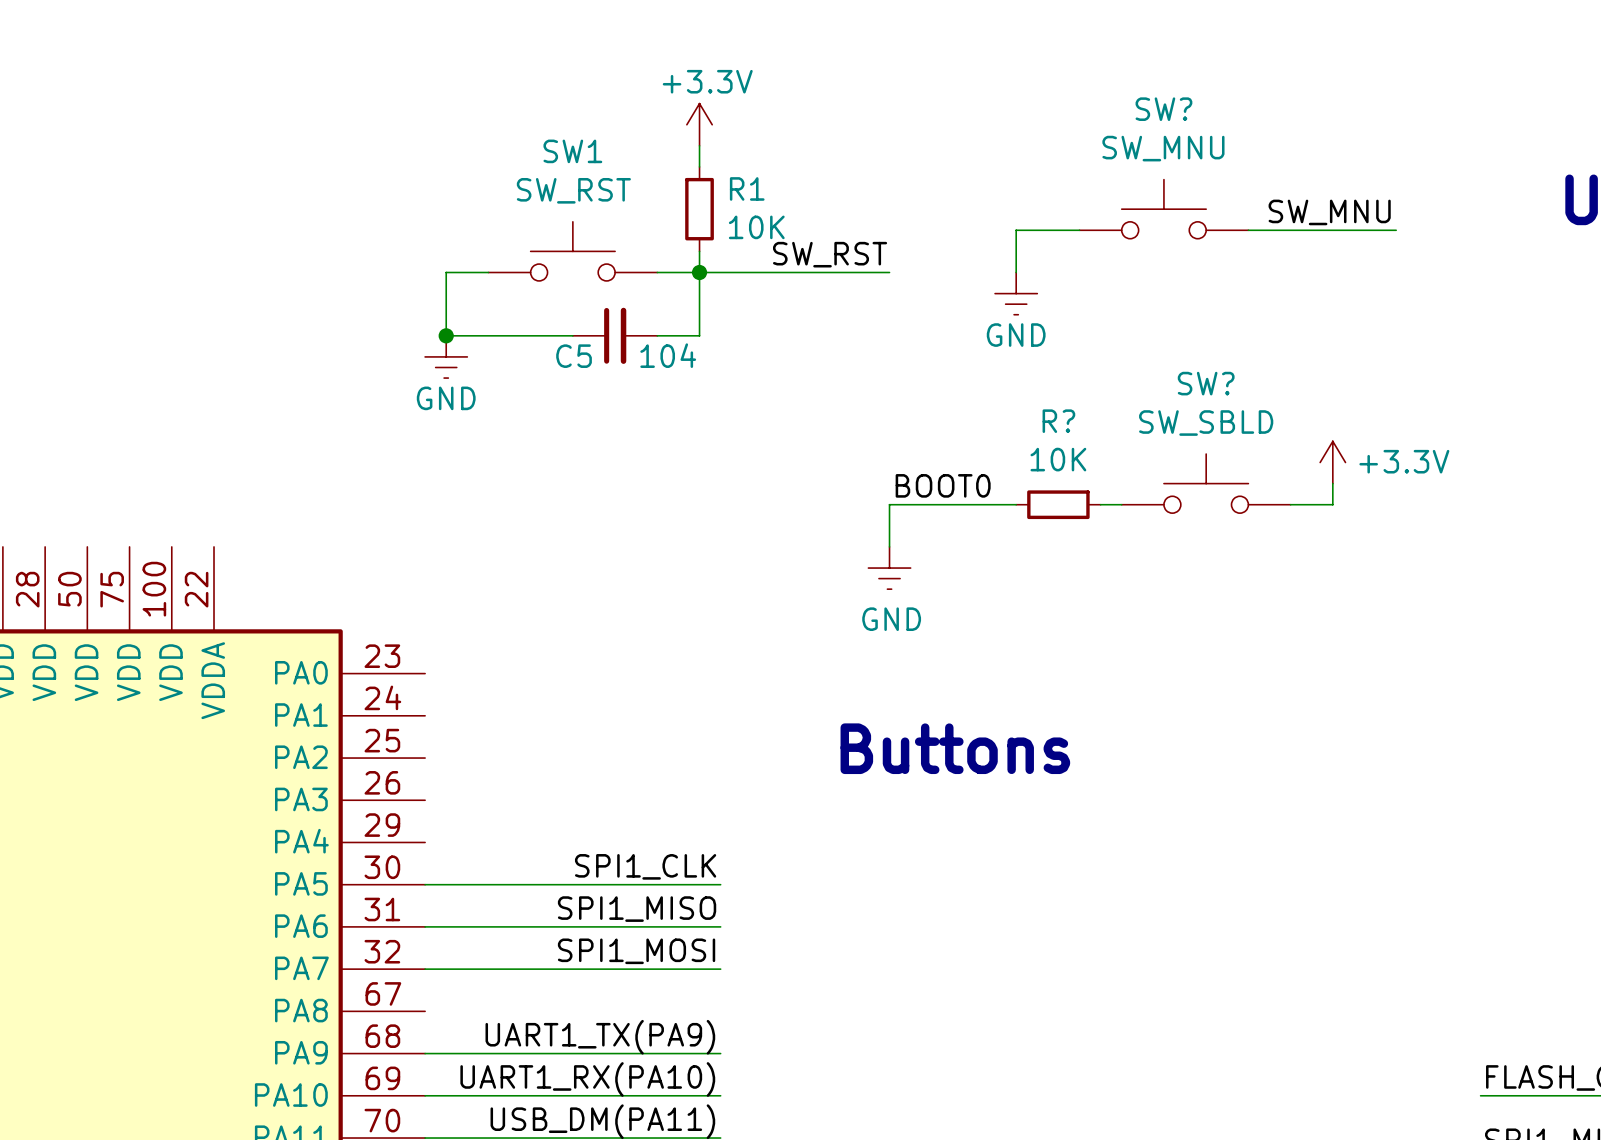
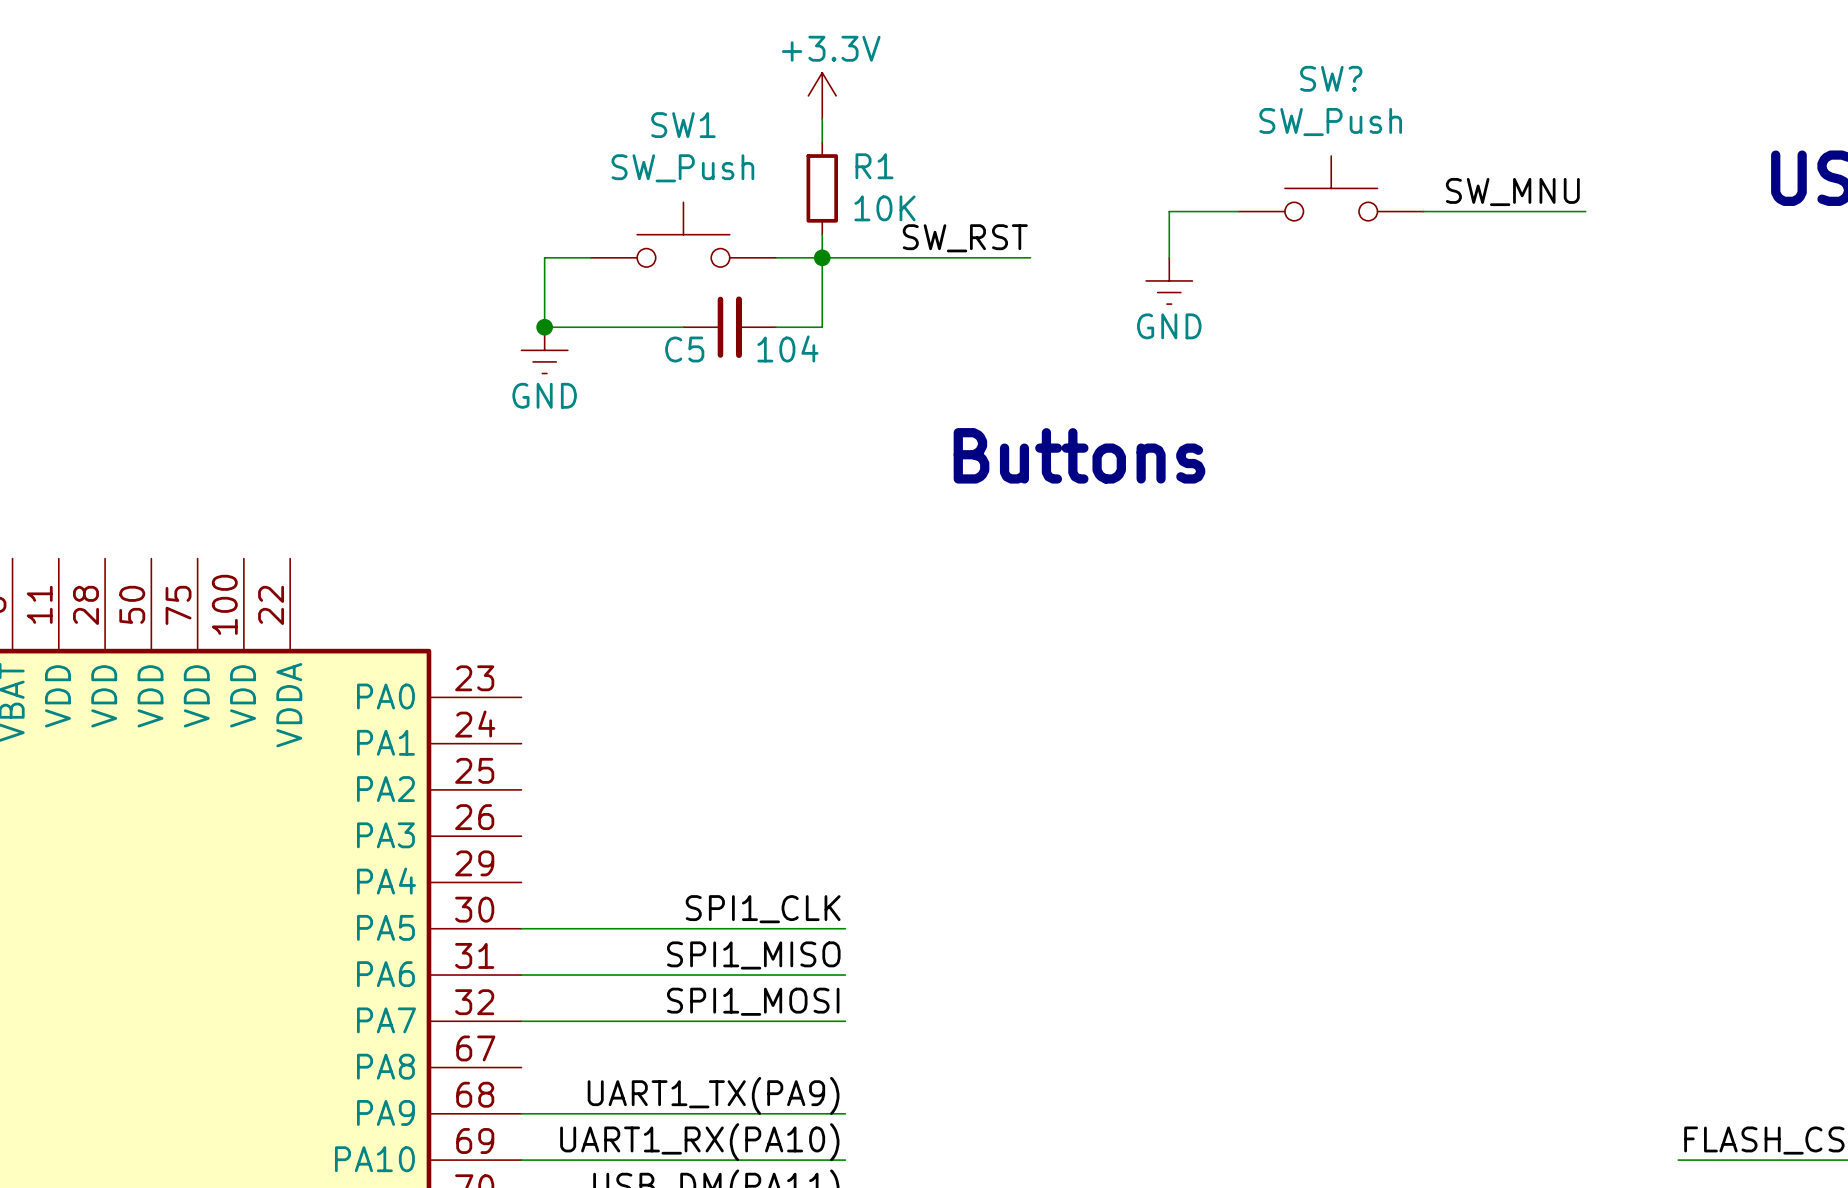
SW? value: SW_MNU (1163, 148) -> SW_Push (1330, 122)
SW1 value: SW_RST (573, 190) -> SW_Push (682, 168)
power symbol: +3.3V (1332, 462) -> none
SW?: SW_SBLD (1206, 483) -> none
wire: (1332, 483) (1332, 504) (1290, 504) -> none
label: BOOT0 (943, 485) -> none
wire: (1016, 504) (889, 504) (889, 546) -> none
R?: 10K (1058, 504) -> none
wire: (1100, 504) (1121, 504) -> none
power symbol: GND (889, 568) -> none
text position: Buttons (955, 748) -> Buttons (1079, 455)

